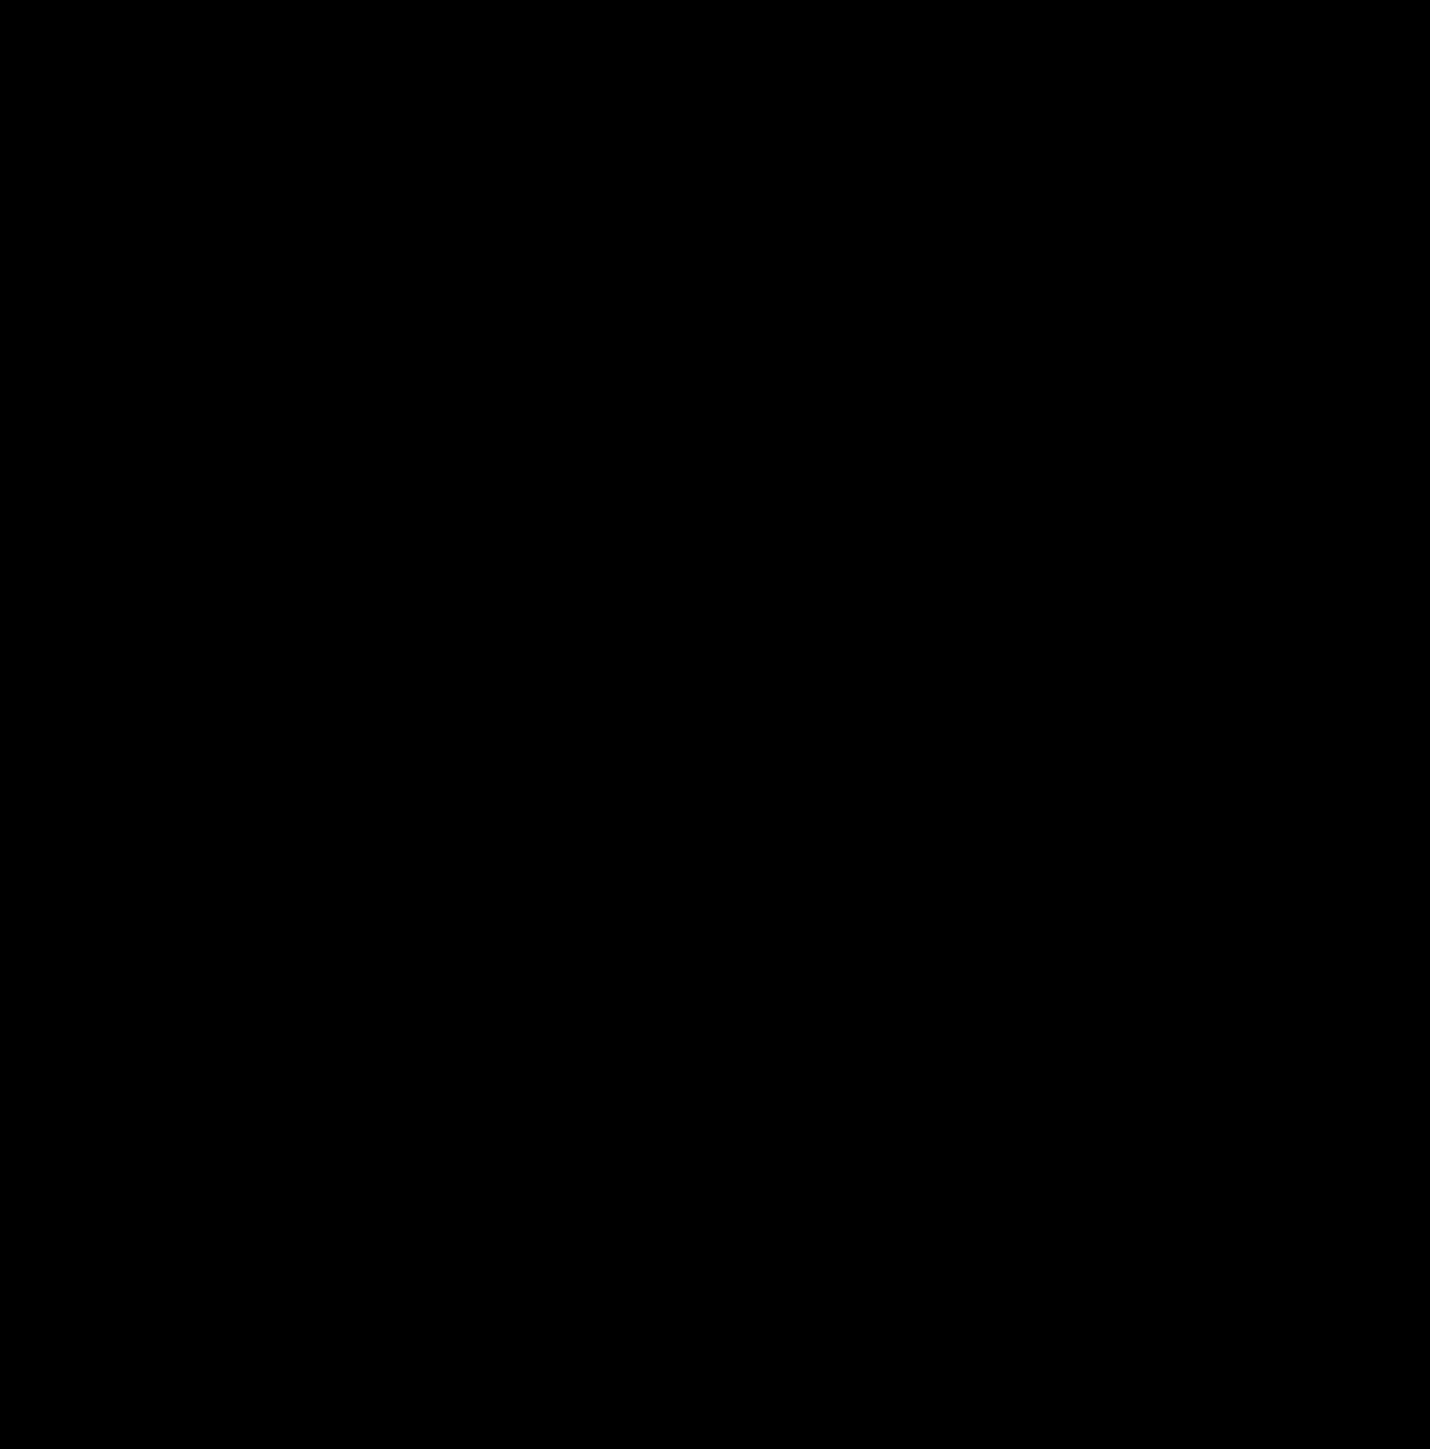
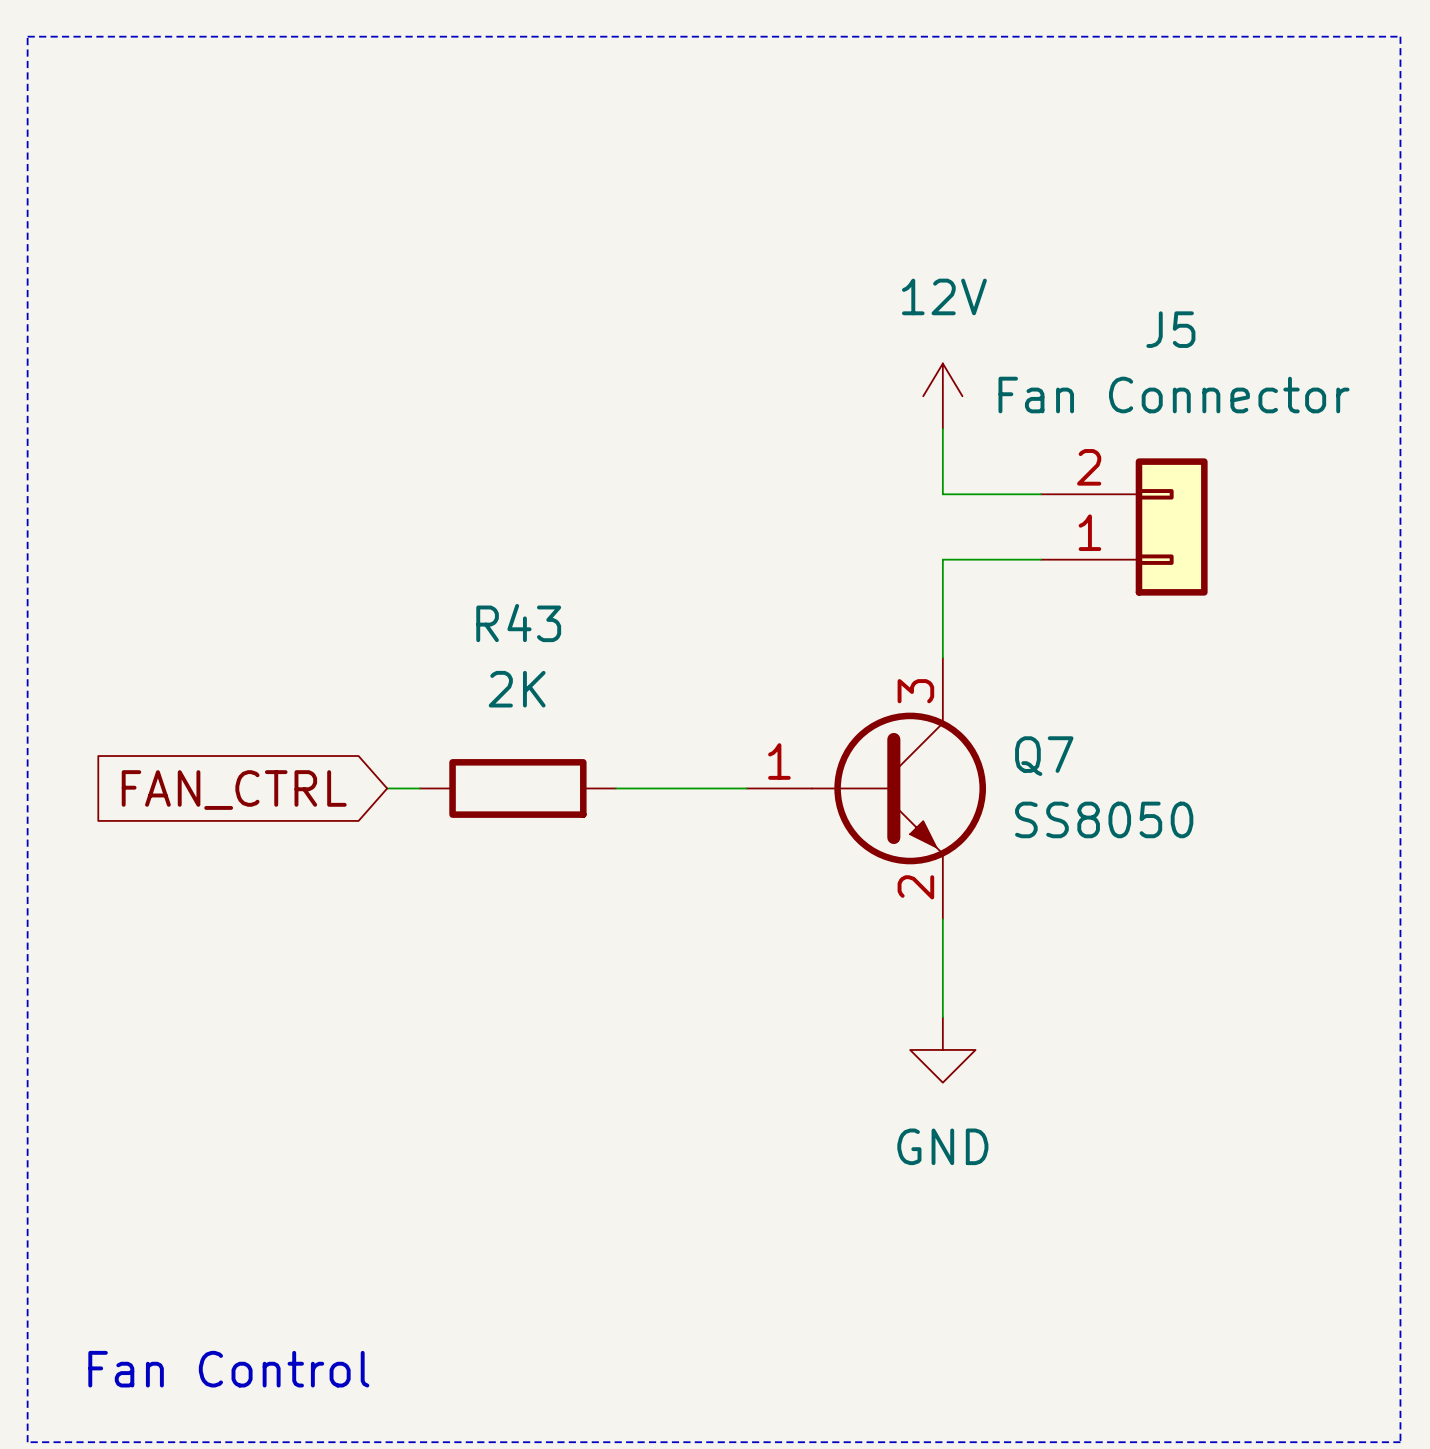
line: none -> (27, 36) (1400, 36) (1400, 1442) (27, 1442) (27, 36)
power symbol: none -> 12V (942, 396)
wire: none -> (942, 428) (942, 494) (1040, 494)
J5: none -> Fan Connector (1124, 526)
wire: none -> (1040, 559) (942, 559) (942, 657)
wire: none -> (387, 788) (419, 788)
R43: none -> 2K (517, 788)
wire: none -> (615, 788) (746, 788)
Q7: none -> SS8050 (866, 788)
global label: none -> FAN_CTRL (234, 790)
wire: none -> (942, 919) (942, 1017)
power symbol: none -> GND (942, 1049)
text: none -> Fan Control (228, 1369)

